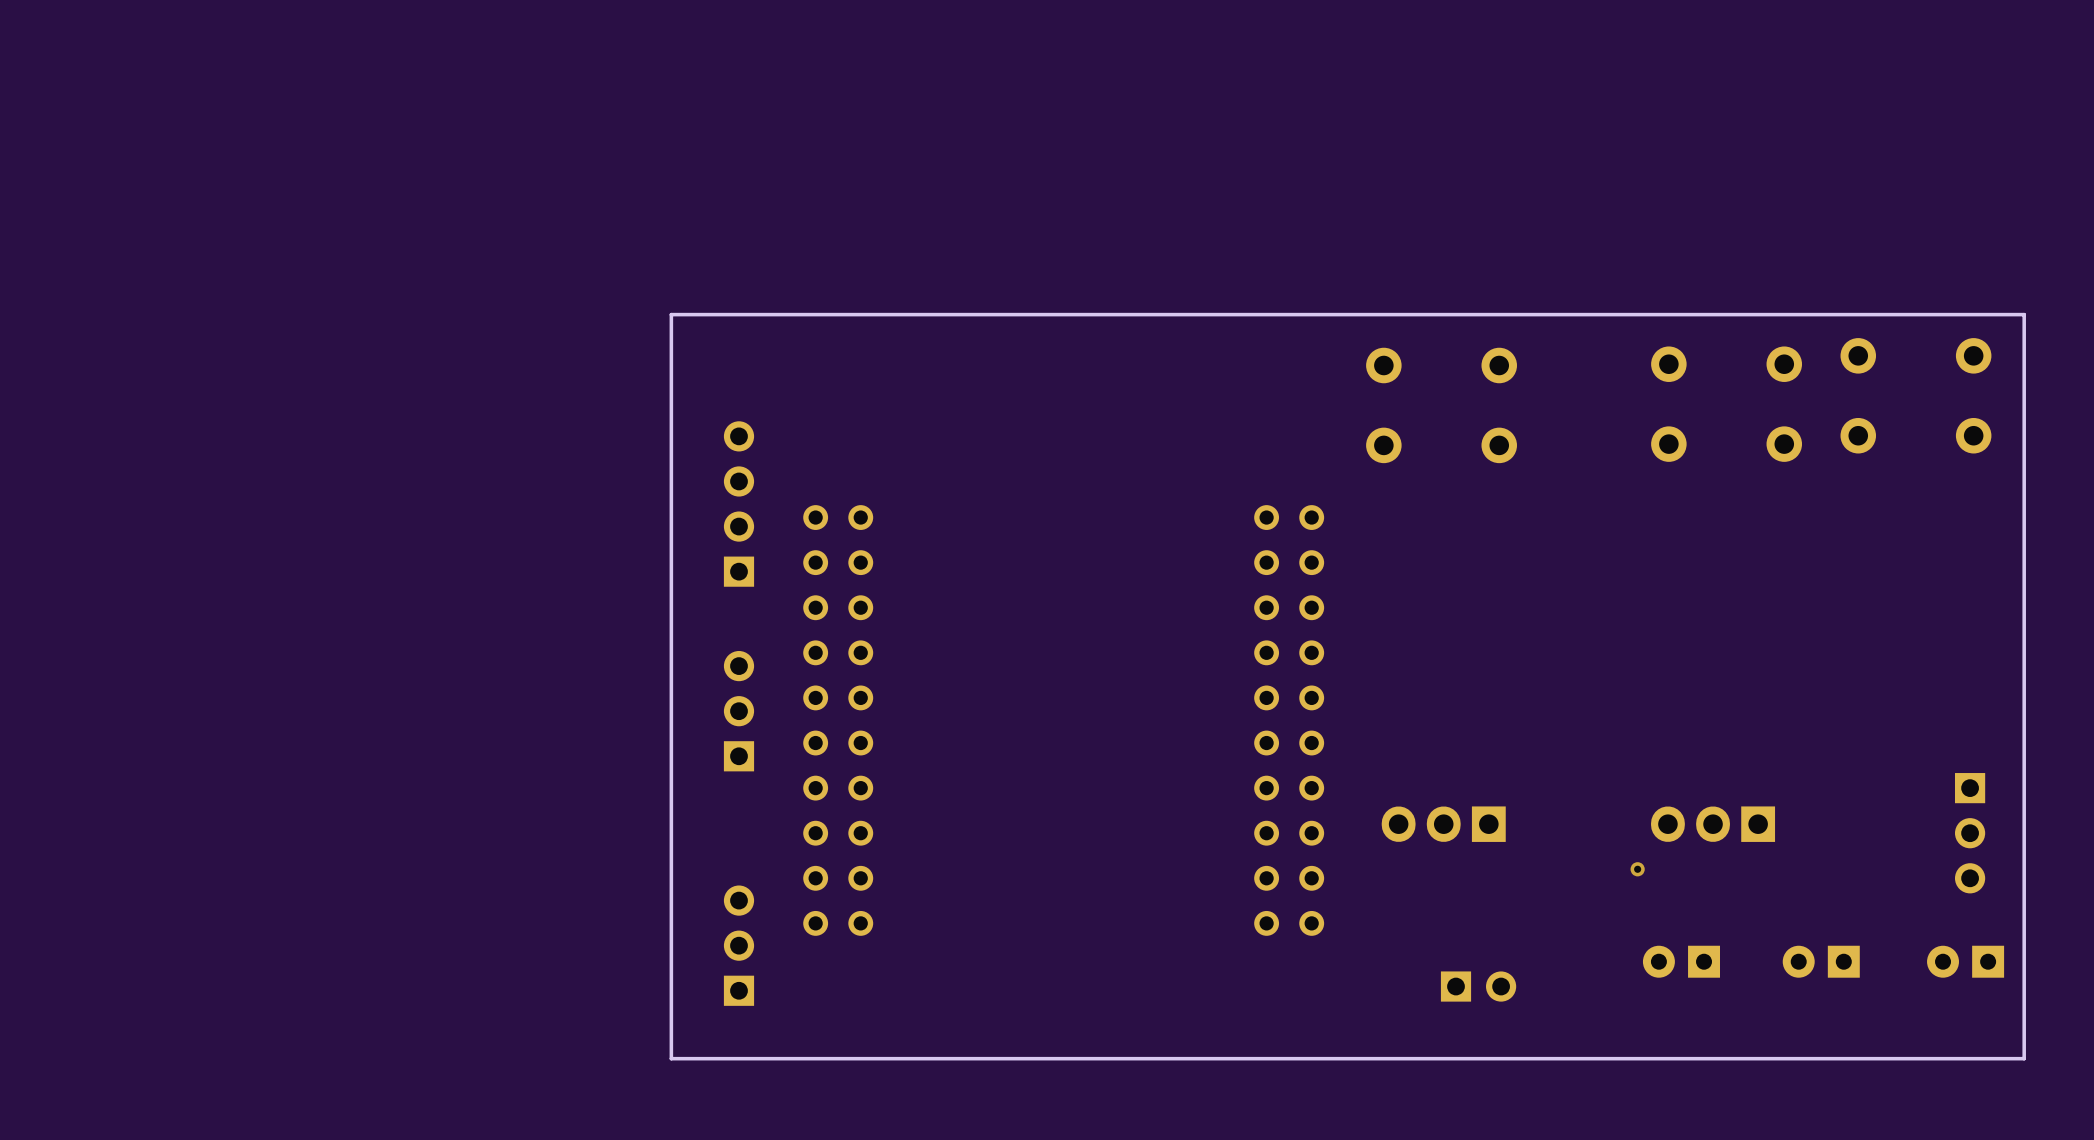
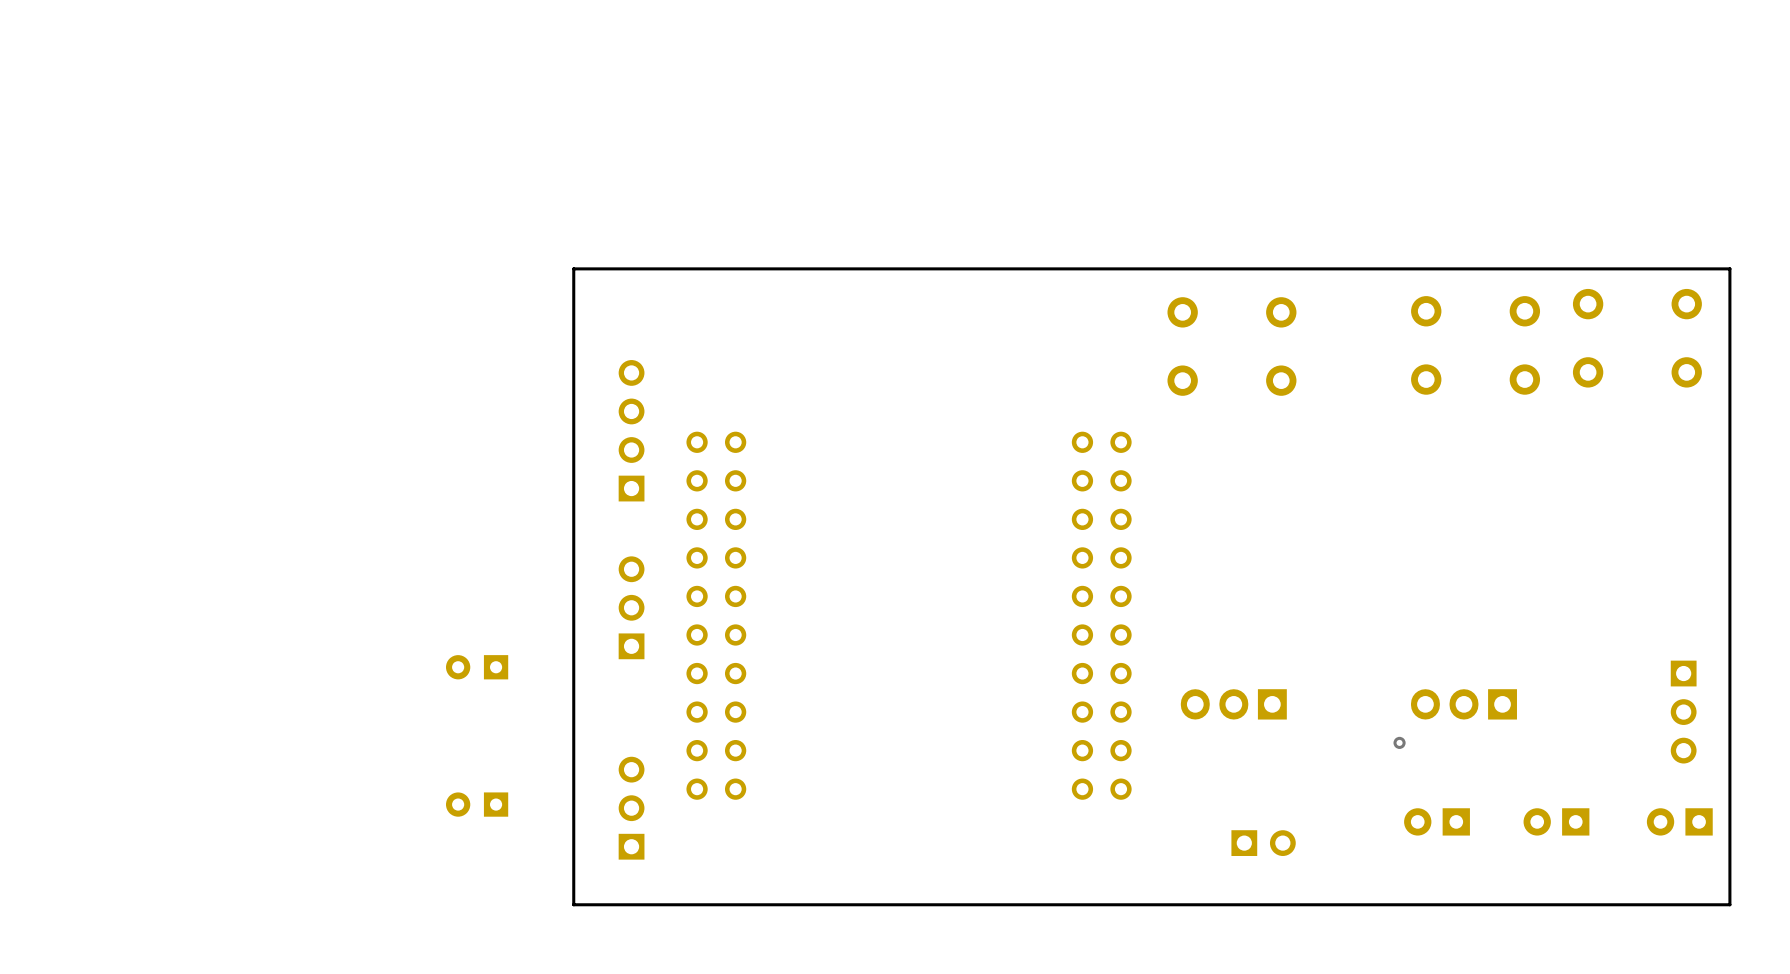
part: none -> (477, 667)
part: none -> (477, 804)

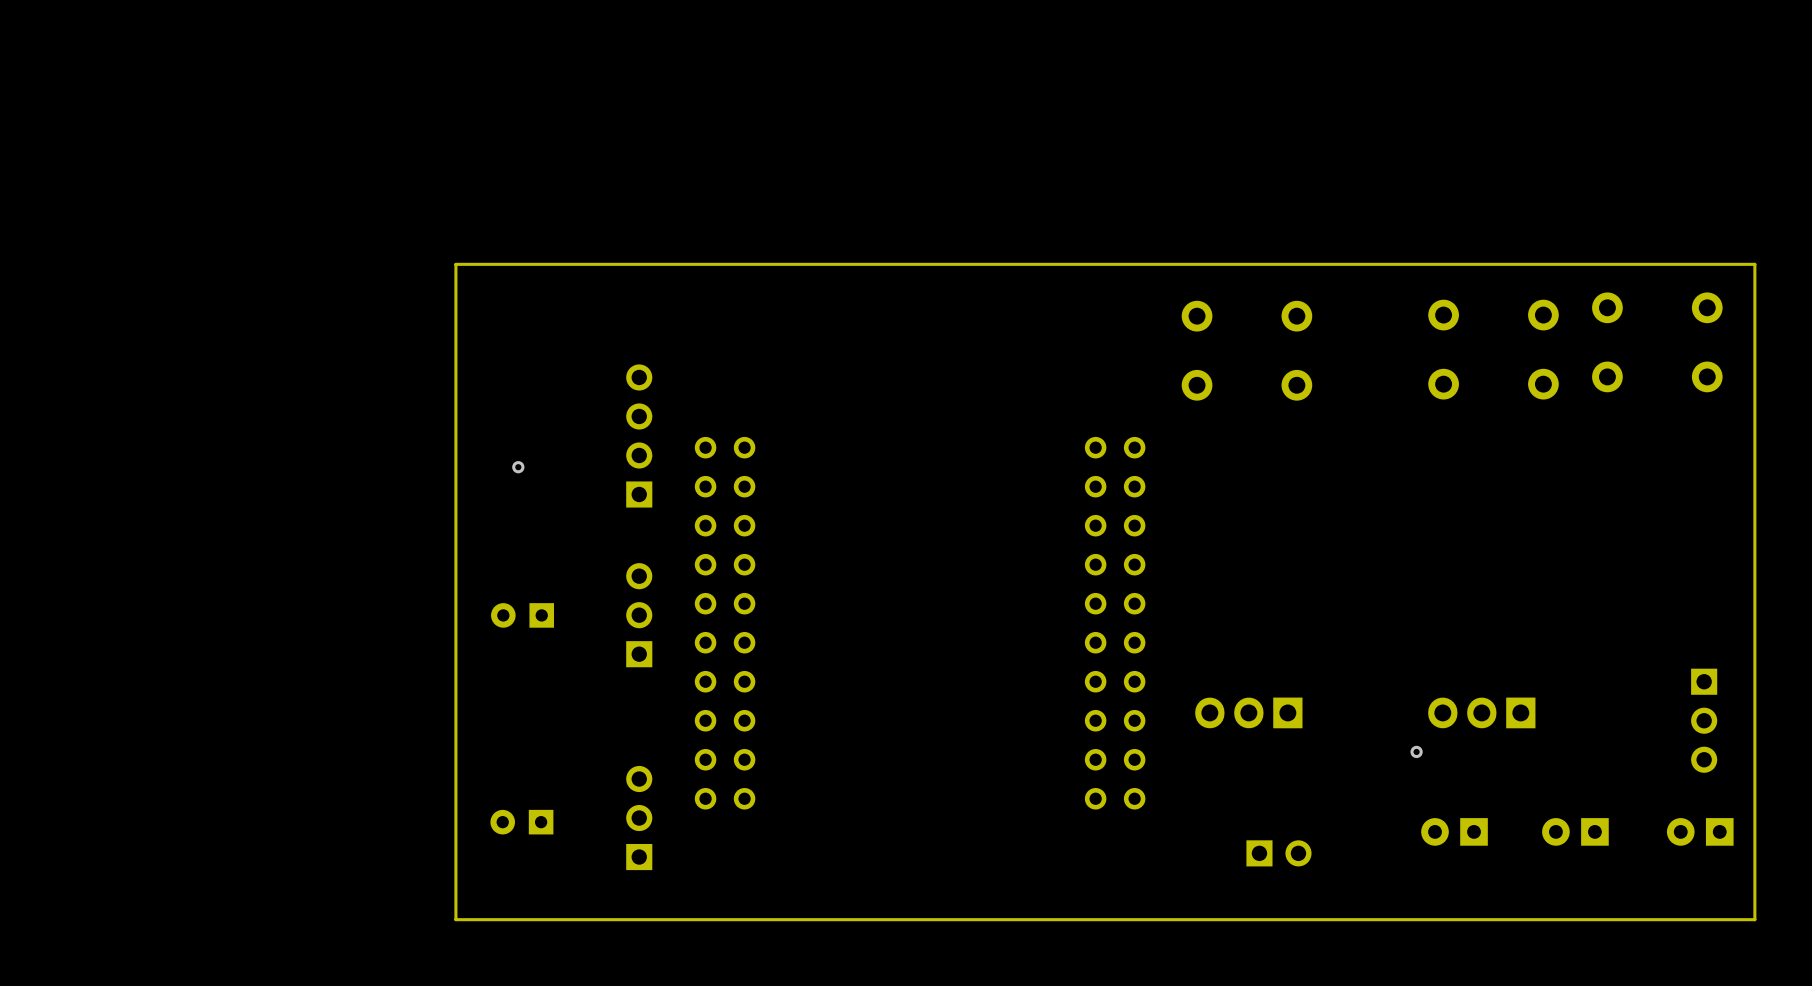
board edge: (1729, 268) (573, 268) (573, 904) (1729, 904) (1729, 268) -> (1754, 264) (1754, 919) (455, 919) (455, 264) (1754, 264)
via: none -> (518, 467)
part position: (477, 667) -> (522, 615)
part position: (477, 804) -> (521, 822)

